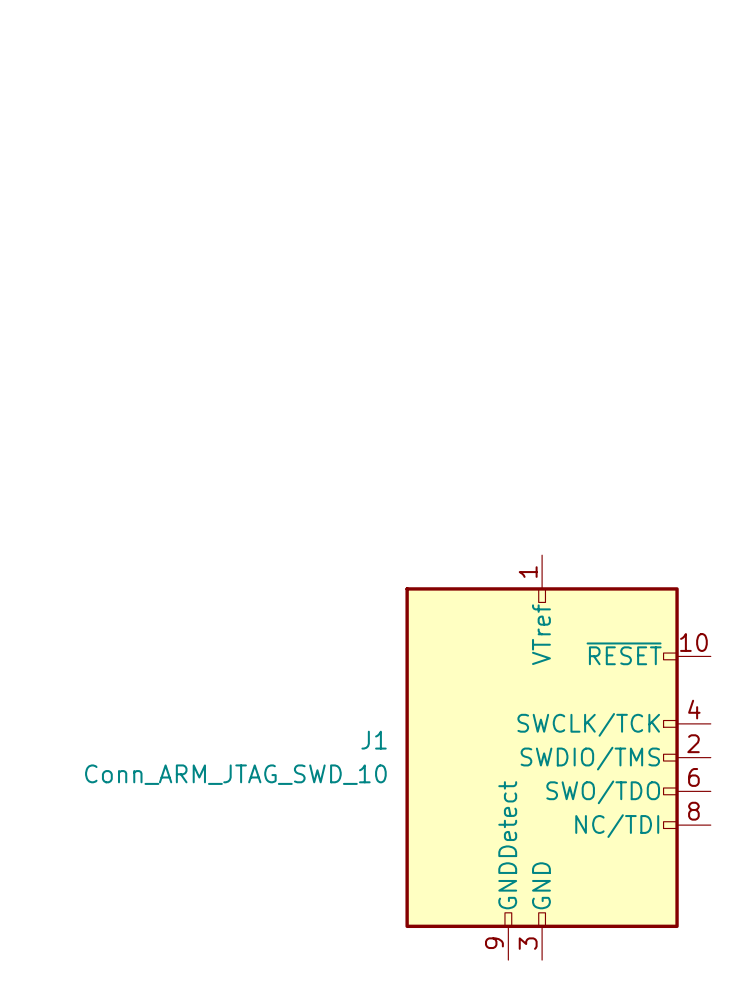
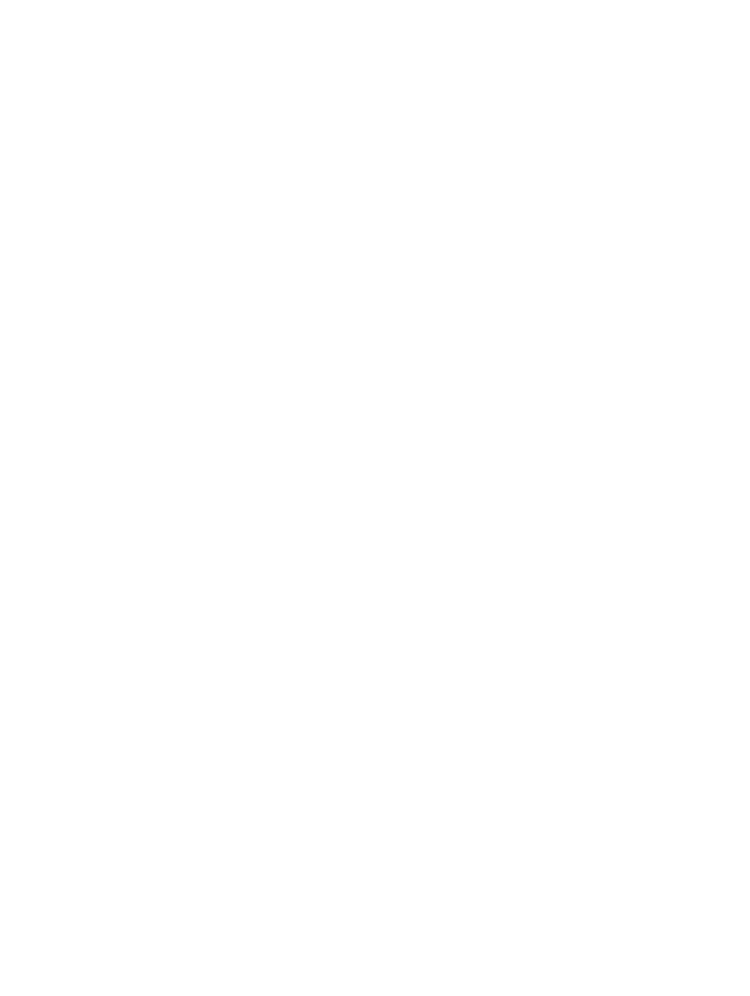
J1: Conn_ARM_JTAG_SWD_10 (558, 757) -> none

